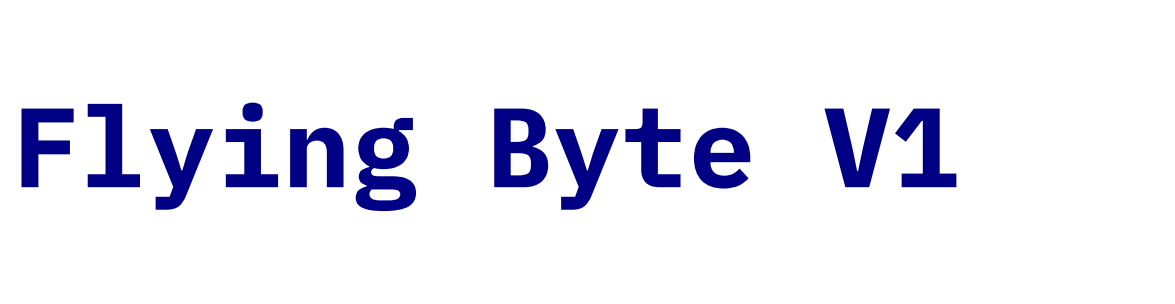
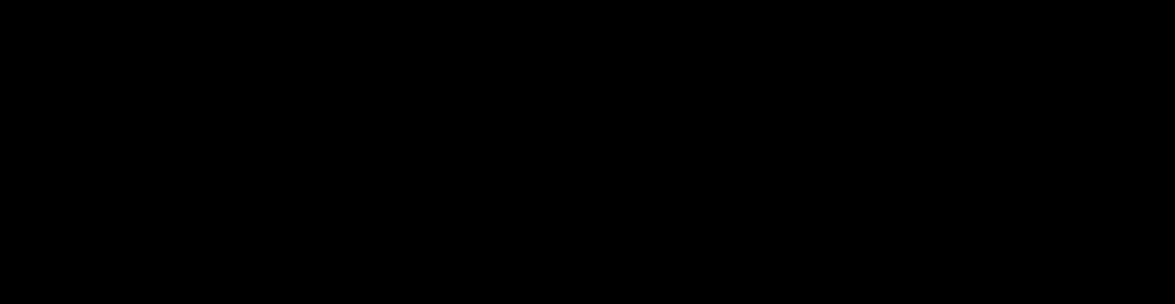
text: Flying Byte V1 (488, 156) -> none

